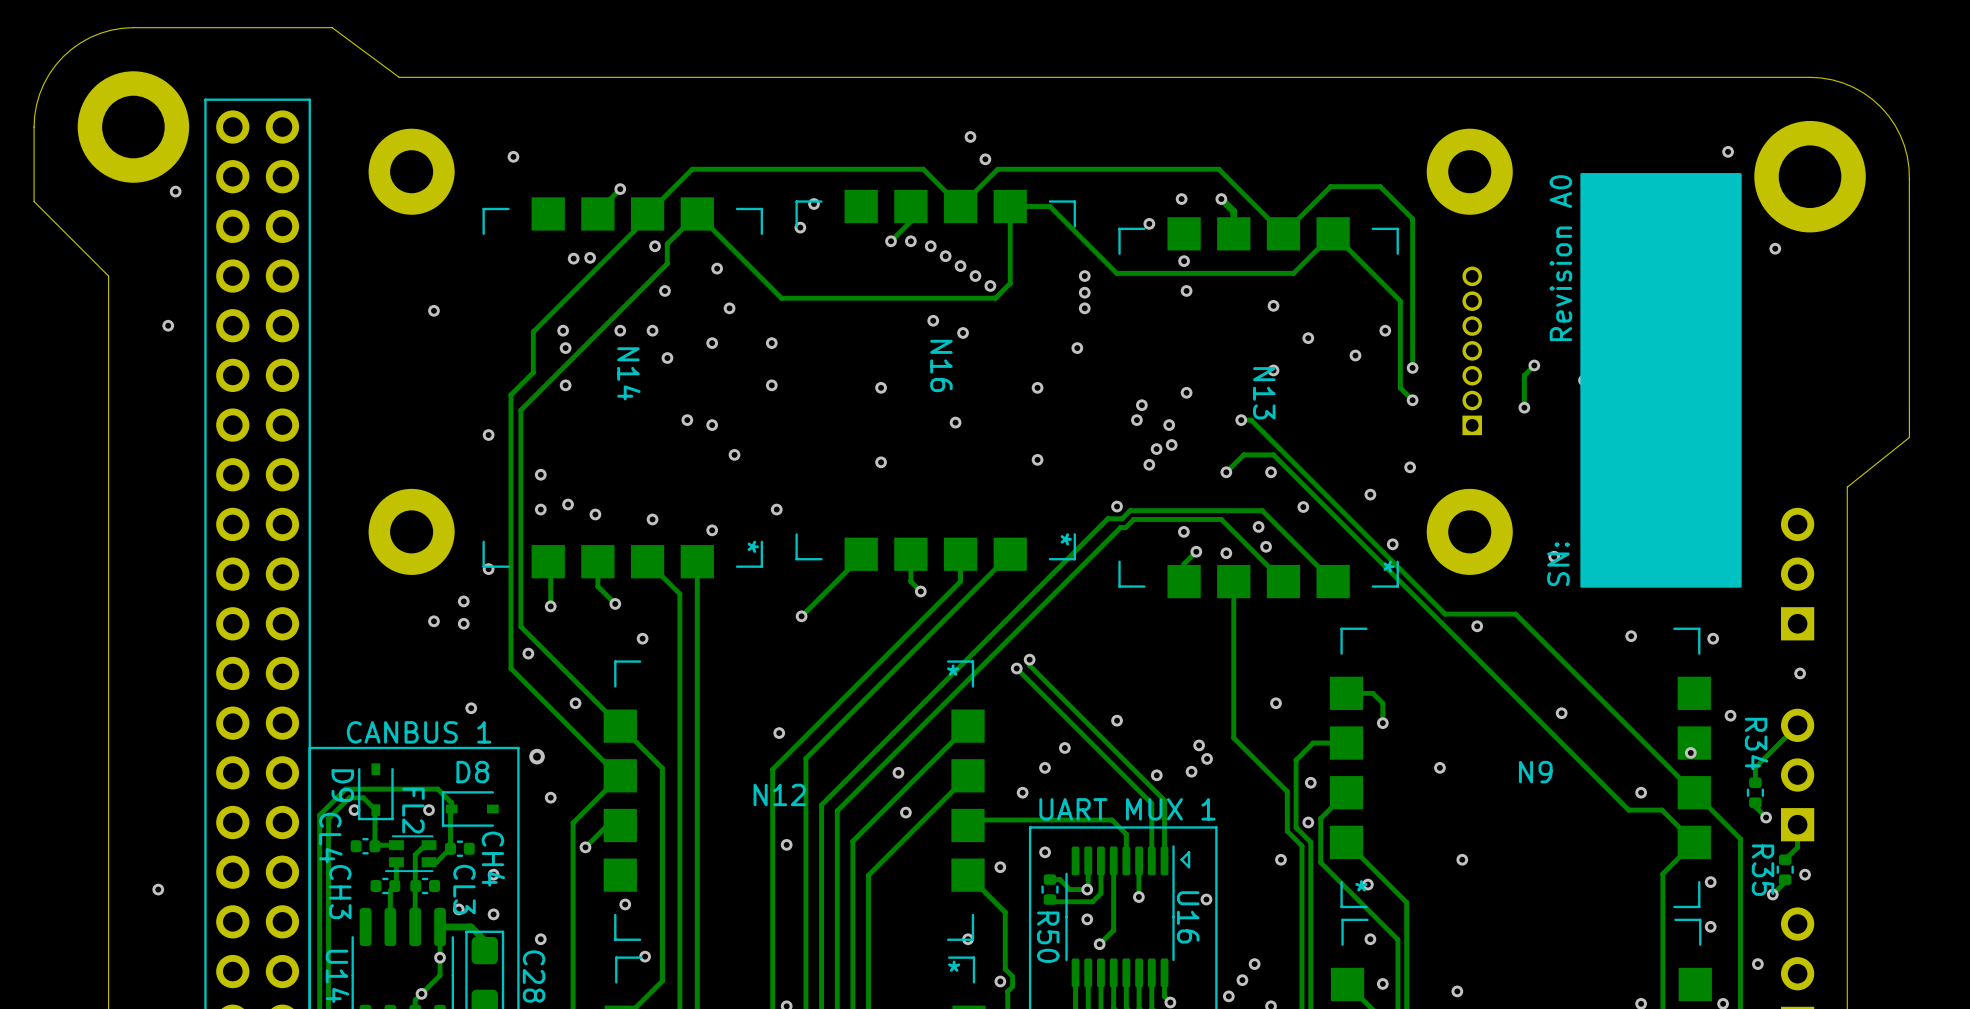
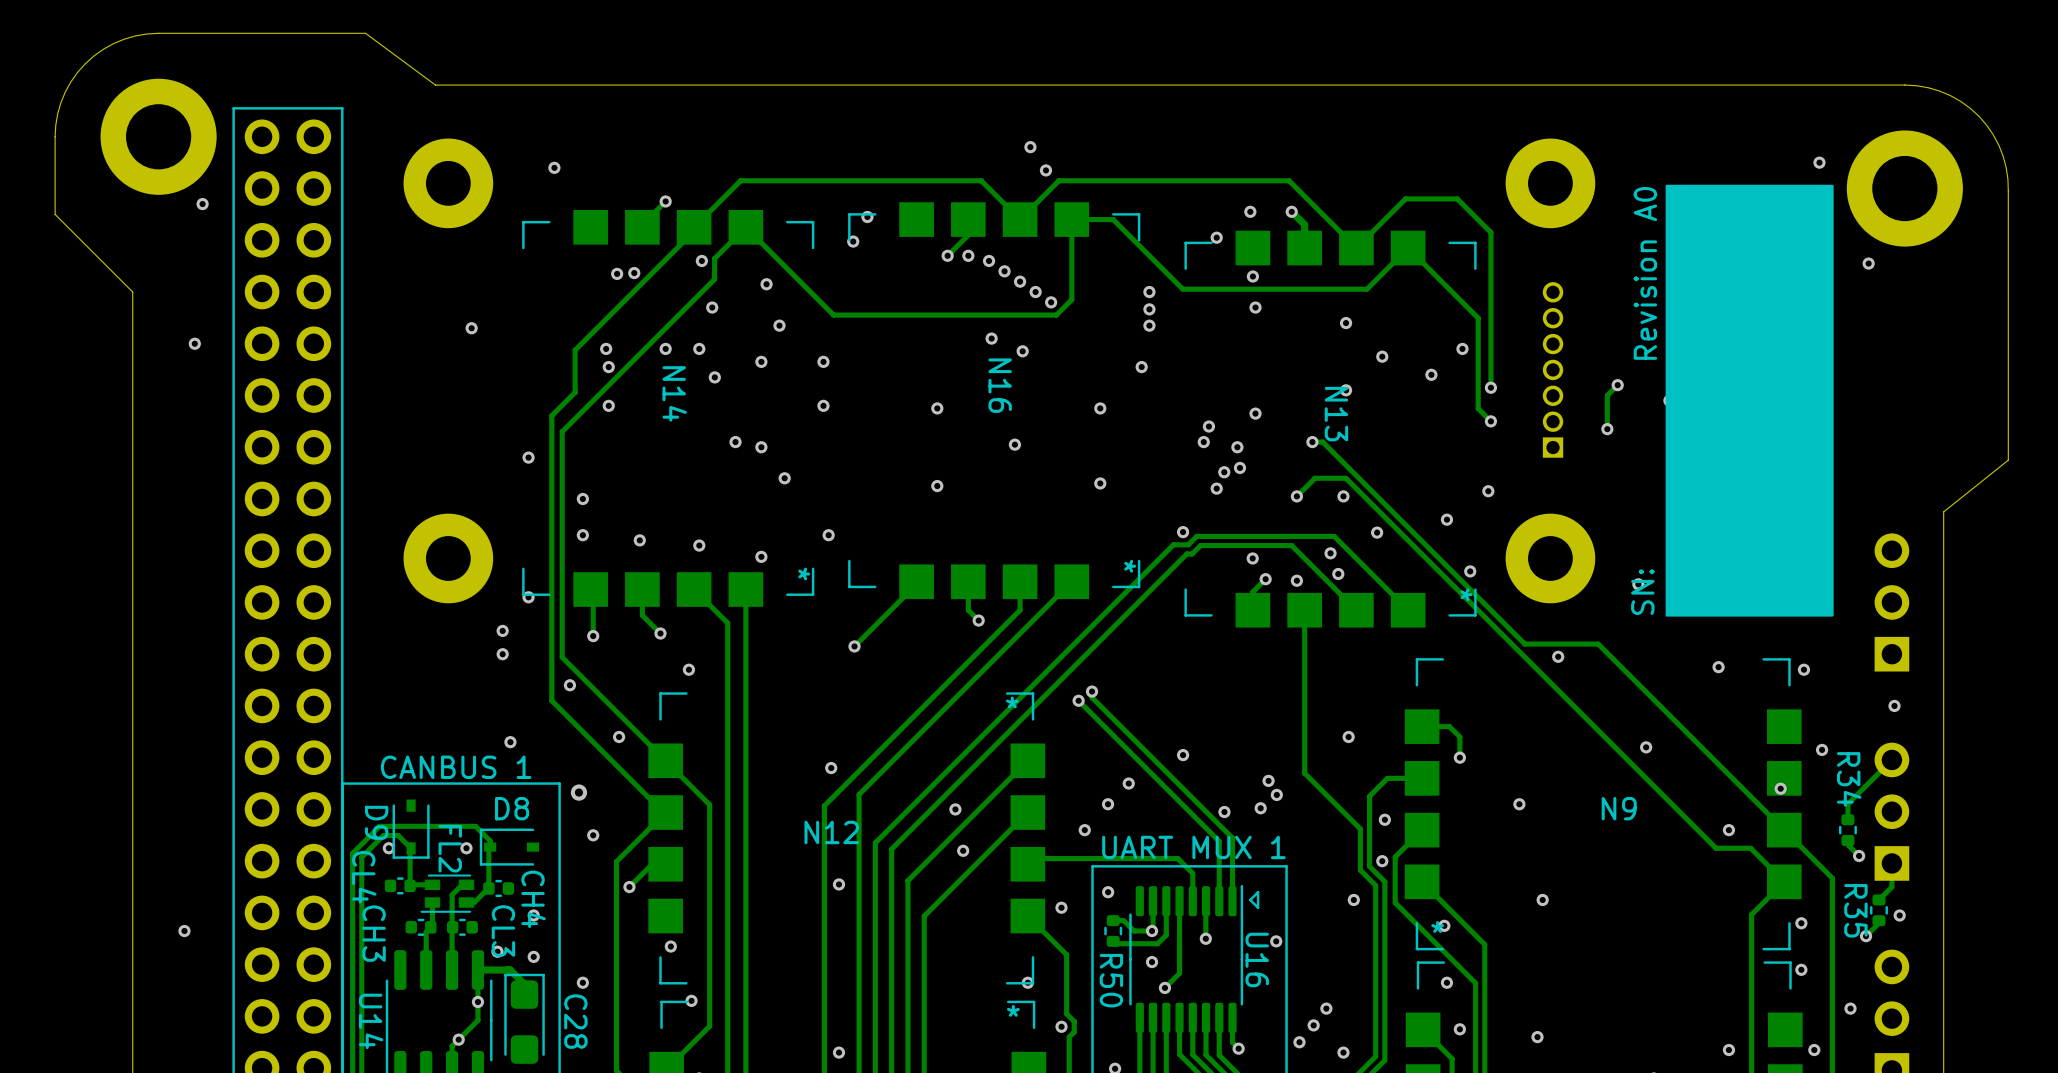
via: (568, 504) -> none
via: (433, 621) -> none

